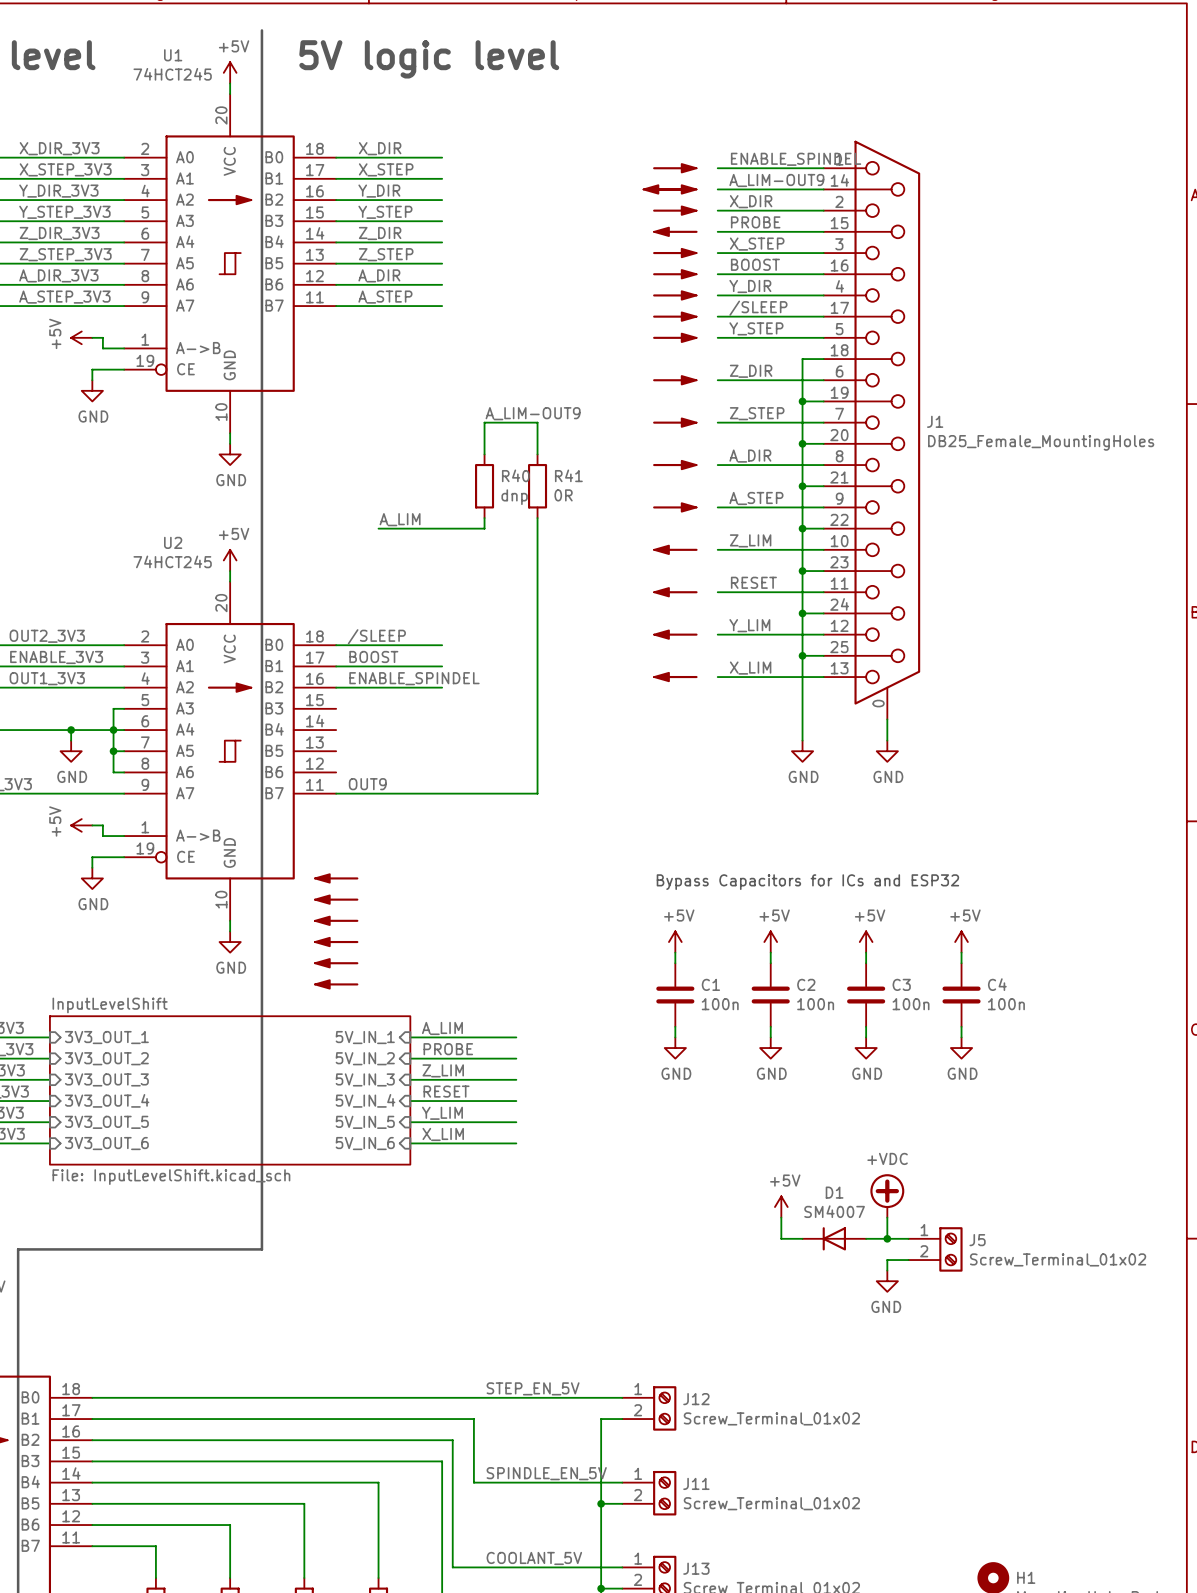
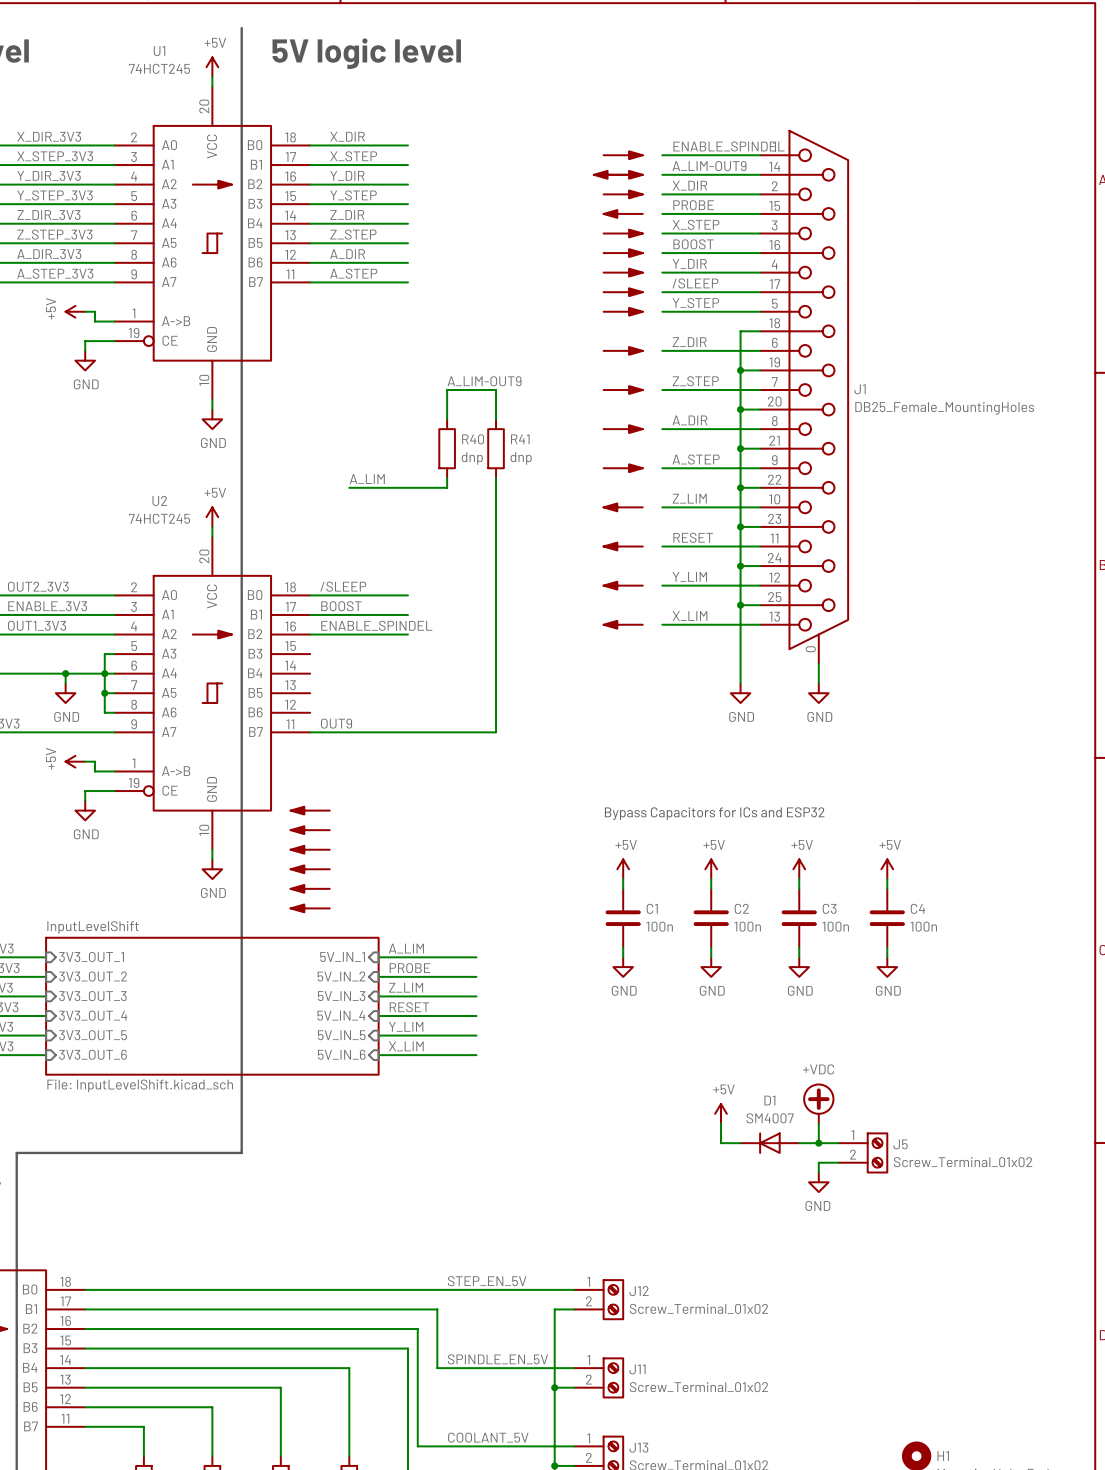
R41 value: 0R (563, 495) -> dnp (521, 458)

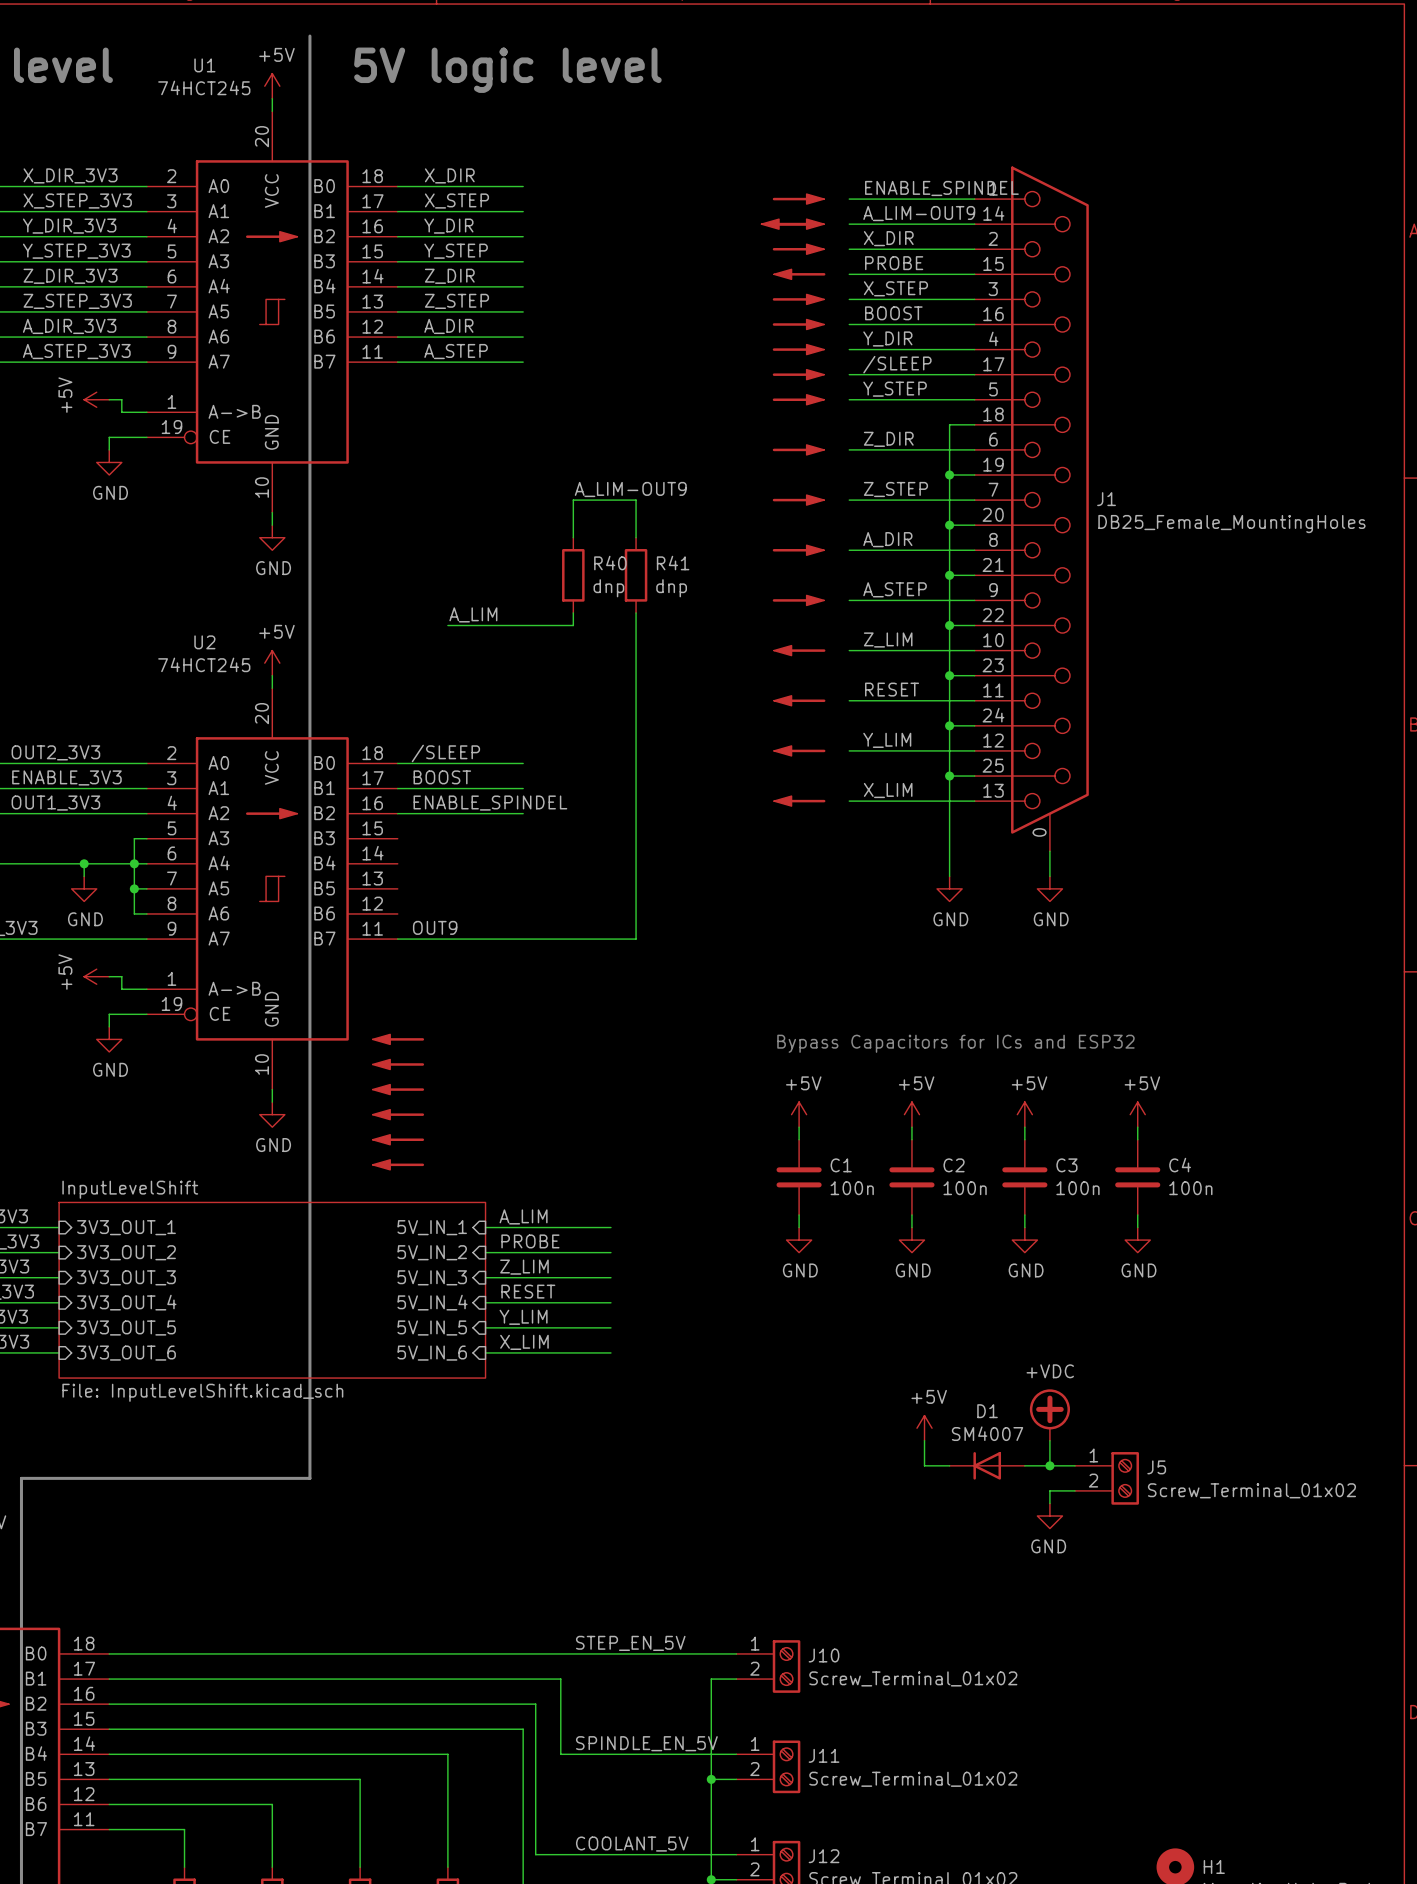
J12 name: J12 (639, 1291) -> J10 (824, 1655)
J13 name: J13 (638, 1447) -> J12 (824, 1856)

